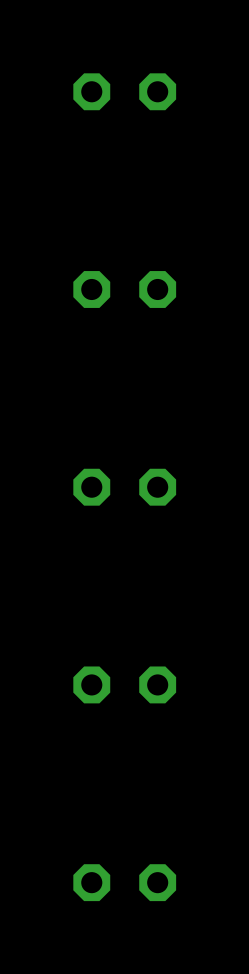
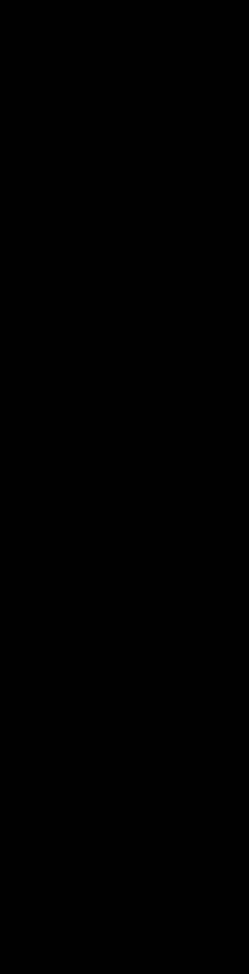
part: (124, 91) -> none
part: (124, 289) -> none
part: (124, 487) -> none
part: (124, 684) -> none
part: (124, 882) -> none

